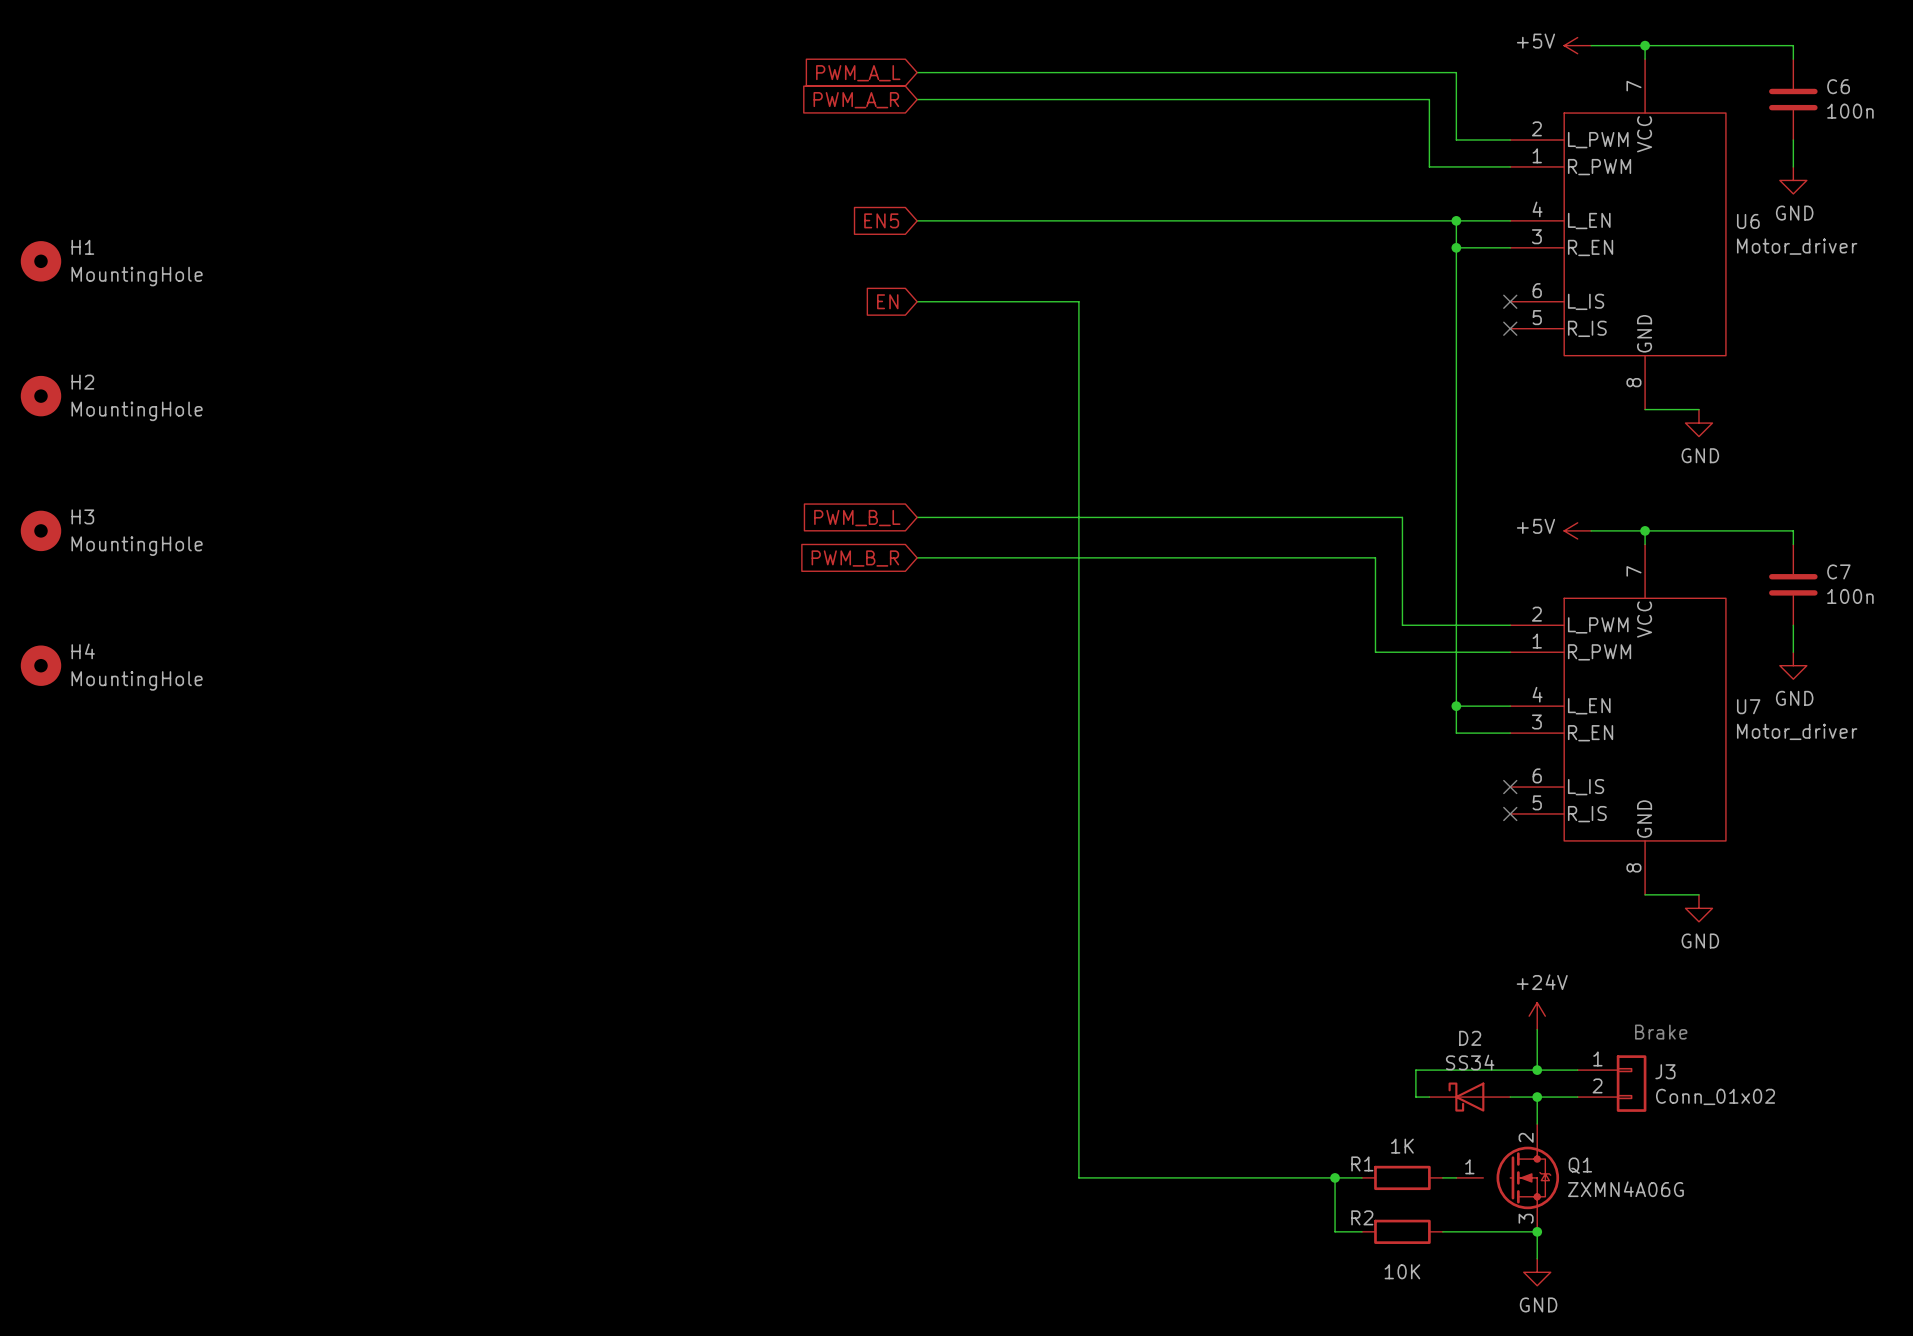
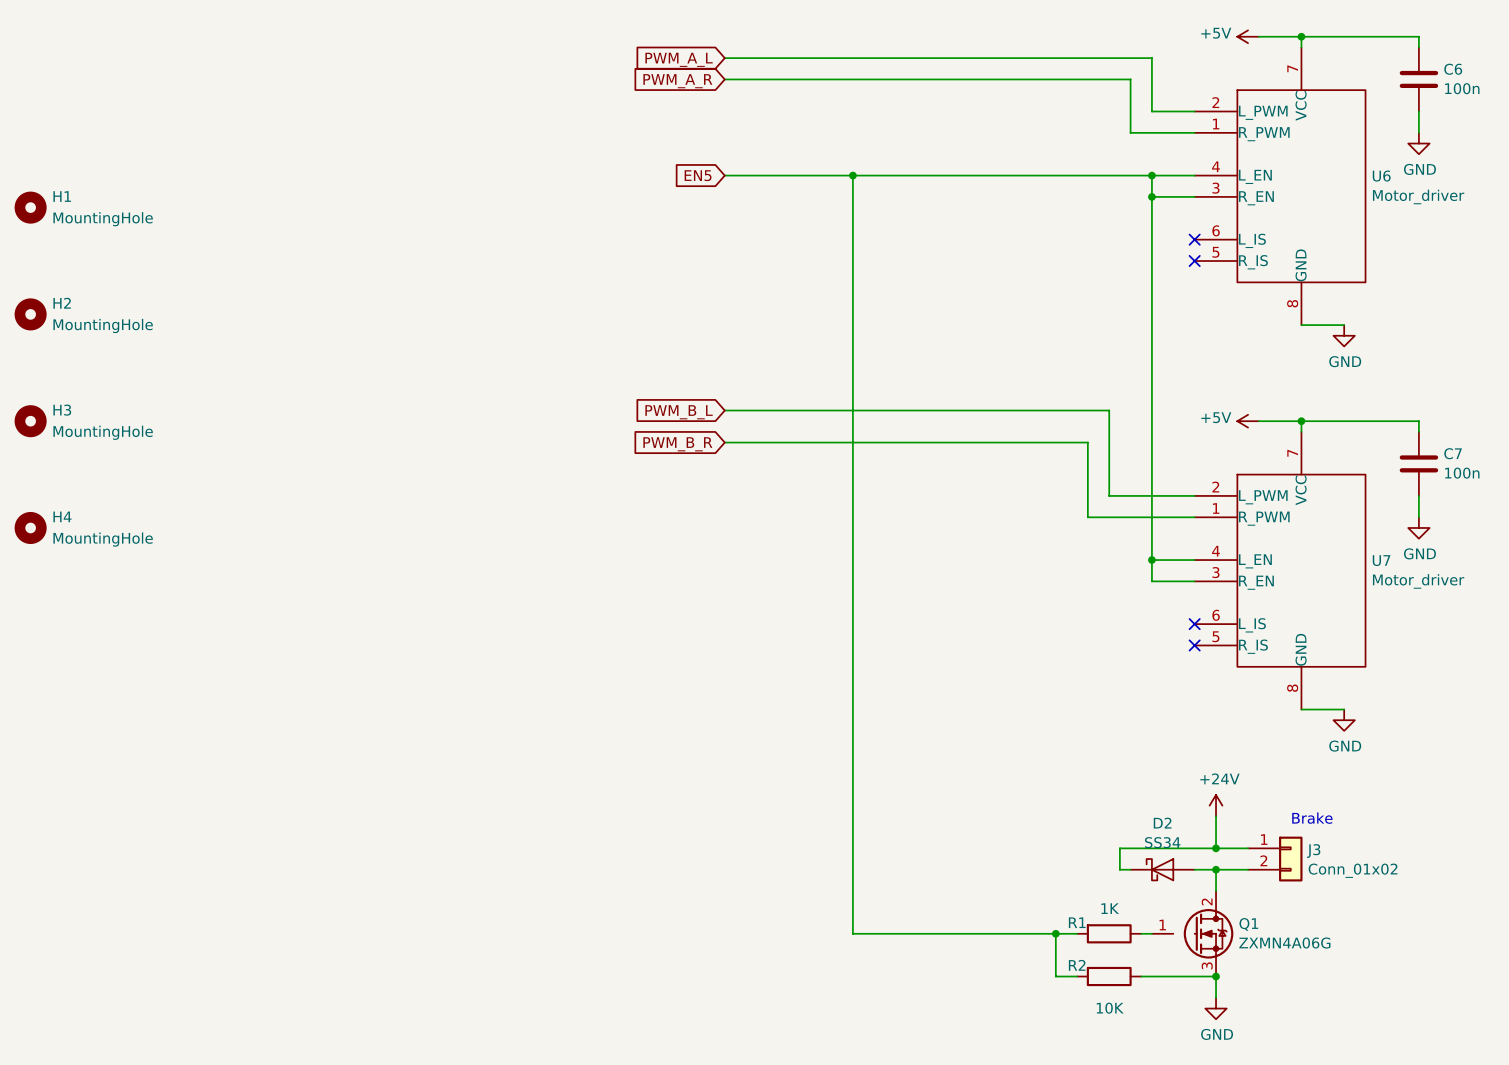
junction: none -> (852, 175)
global label: EN (887, 301) -> none
wire: (917, 301) (1078, 301) -> (852, 175) (852, 239)

